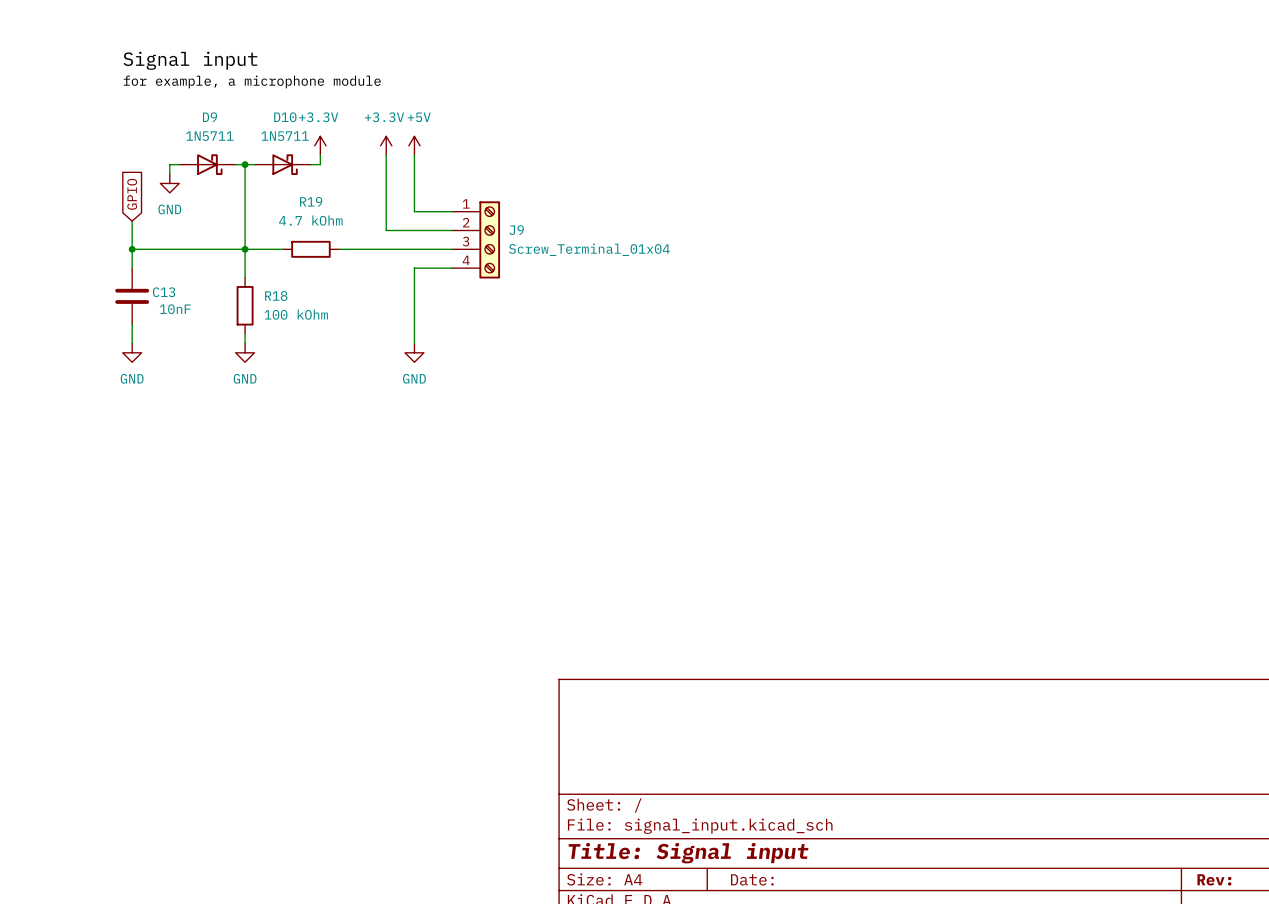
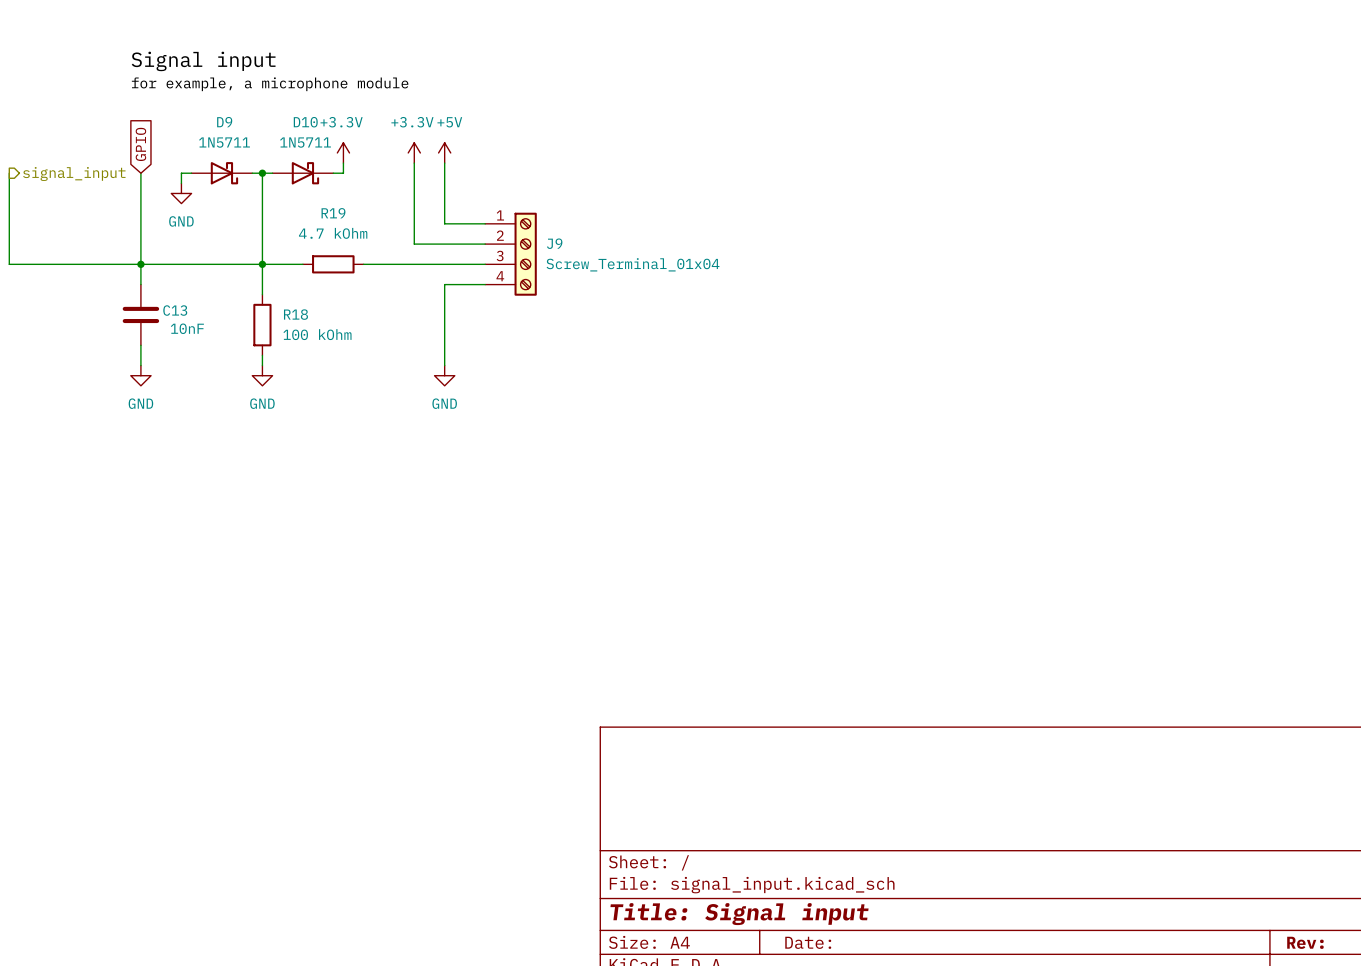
wire: none -> (9, 173) (9, 264) (140, 264)
wire: none -> (140, 173) (140, 233)
hierarchical label: none -> signal_input (74, 174)
global label position: GPIO (132, 194) -> GPIO (140, 144)

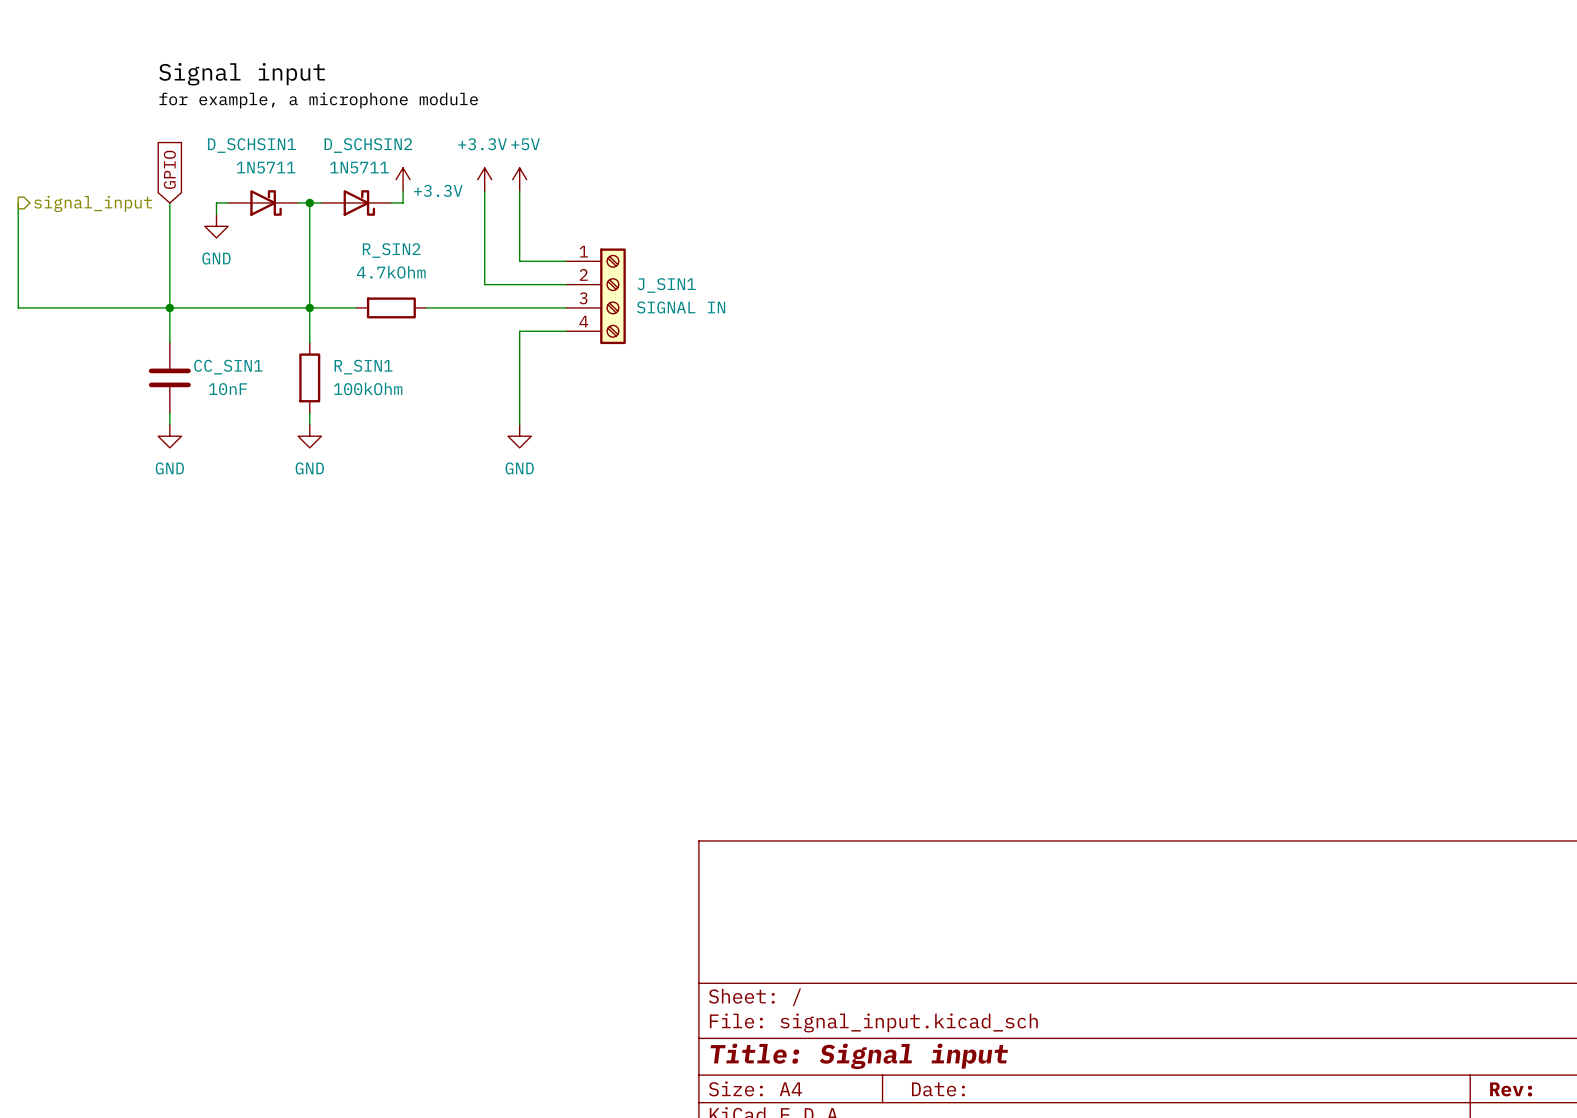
D9 name: D9 (224, 122) -> D_SCHSIN1 (251, 145)
D10 name: D10 (305, 122) -> D_SCHSIN2 (368, 145)
power symbol text position: +3.3V (341, 122) -> +3.3V (438, 190)
R19 name: R19 (333, 213) -> R_SIN2 (391, 250)
R19 value: 4.7 kOhm (333, 233) -> 4.7kOhm (391, 272)
J9 name: J9 (554, 243) -> J_SIN1 (666, 285)
J9 value: Screw_Terminal_01x04 (633, 264) -> SIGNAL IN (681, 307)
C13: 10nF (140, 314) -> none
R18 name: R18 (295, 314) -> R_SIN1 (363, 367)
CC_SIN1: none -> 10nF (169, 377)
R18 value: 100 kOhm (317, 334) -> 100kOhm (368, 388)

